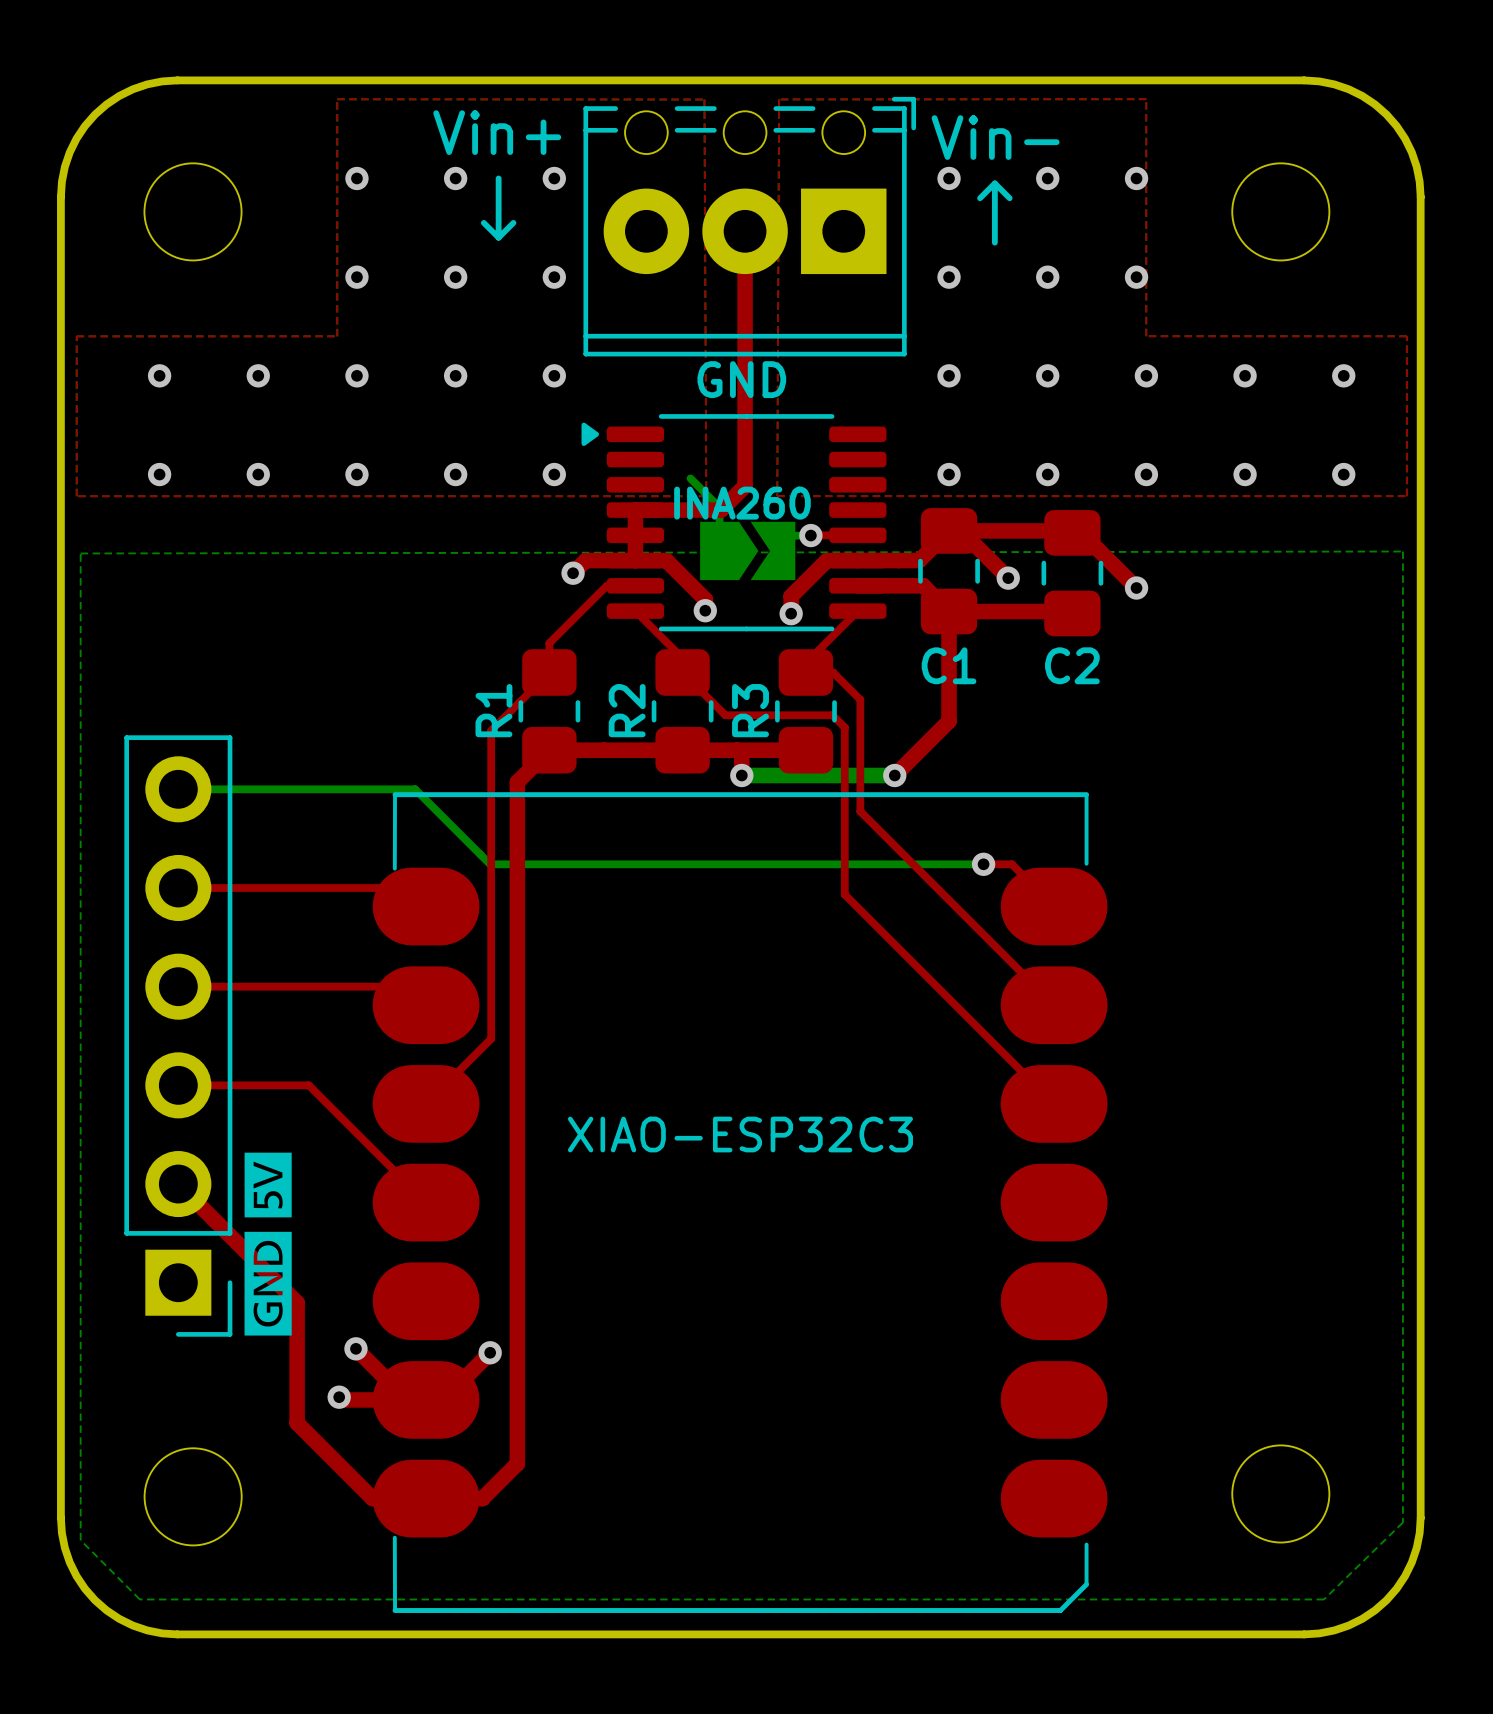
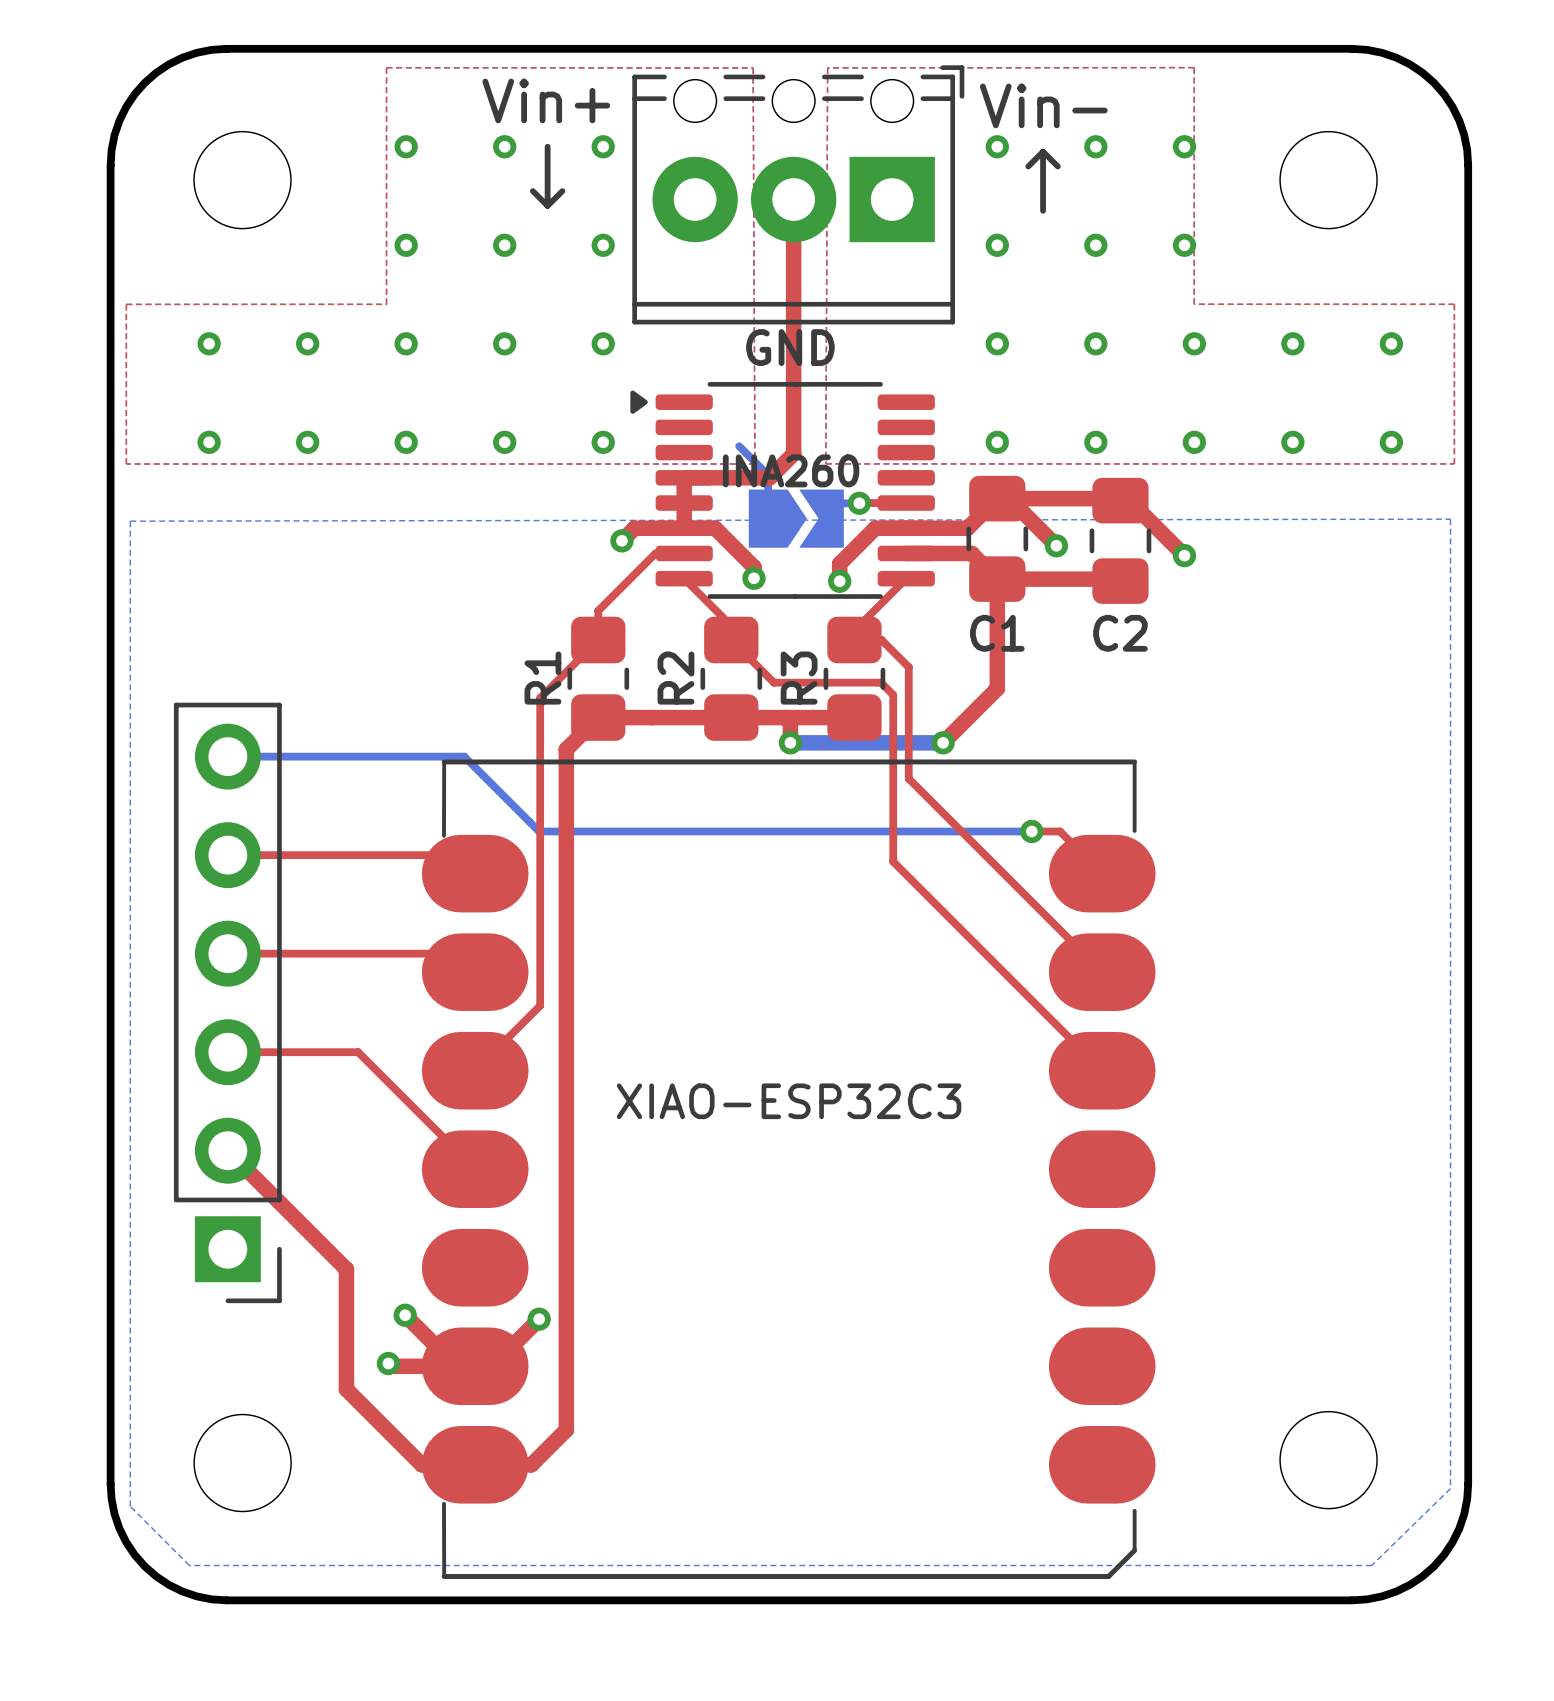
drawing: [244, 1152, 292, 1336] -> none

